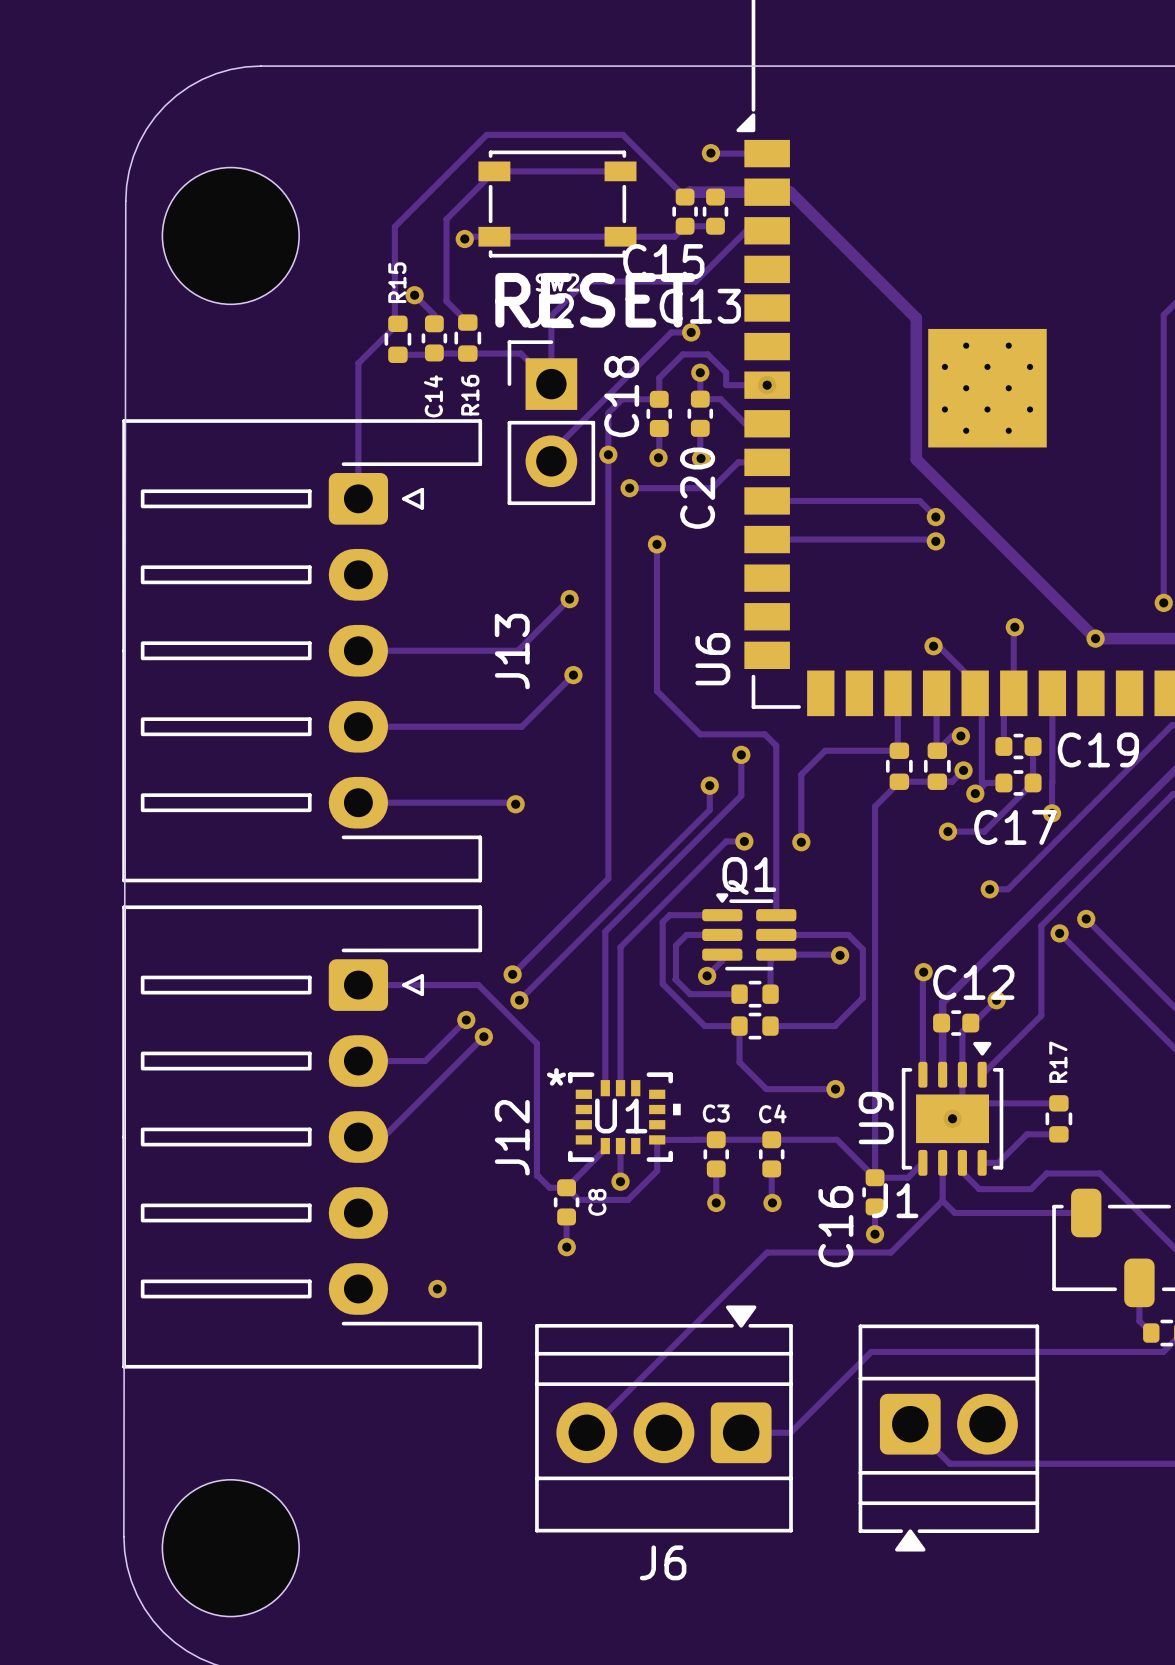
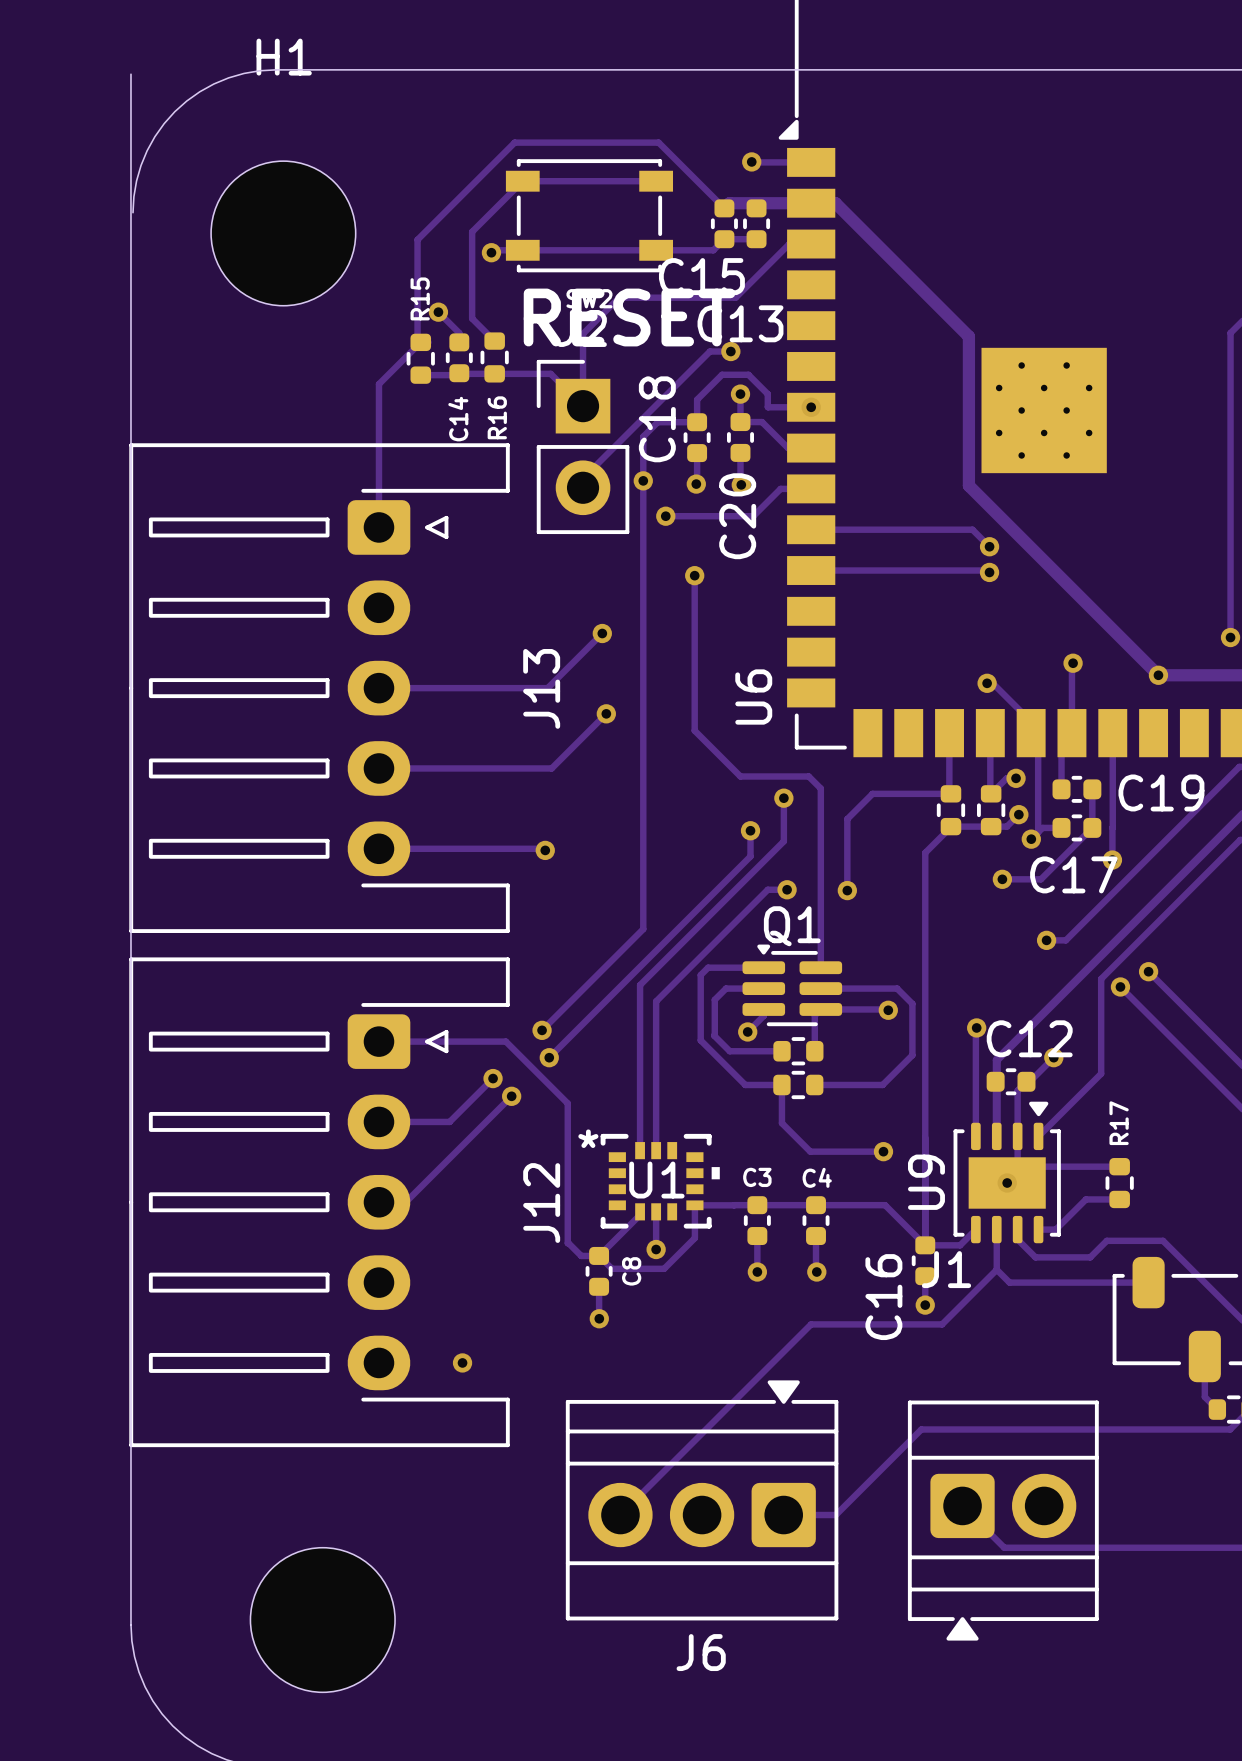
board edge: (125, 201) (123, 1536) -> (130, 74) (130, 1625)
H1: none -> (283, 233)
part: (230, 235) -> none
part position: (230, 1548) -> (322, 1620)

